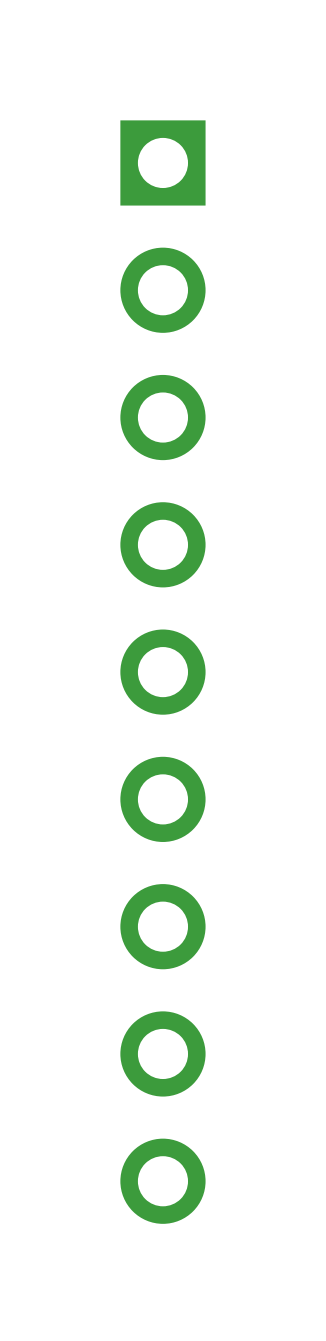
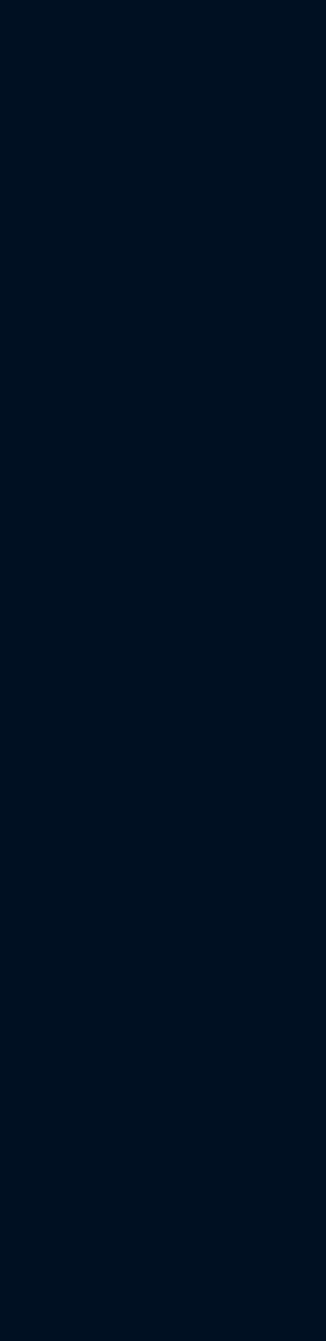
part: (162, 672) -> none

